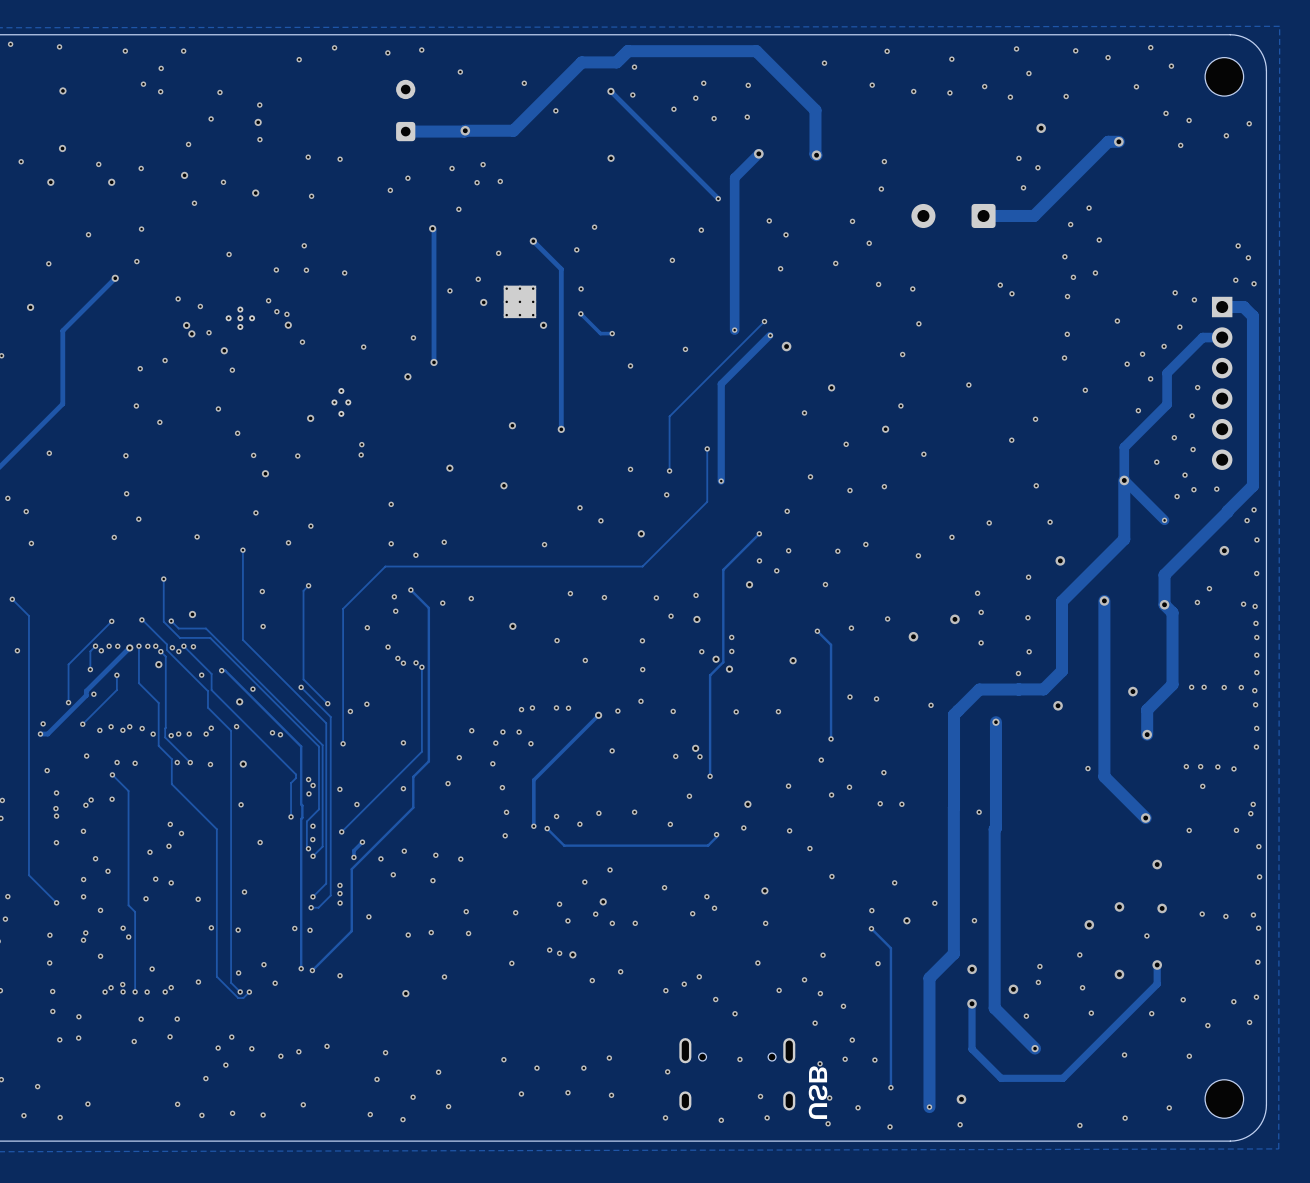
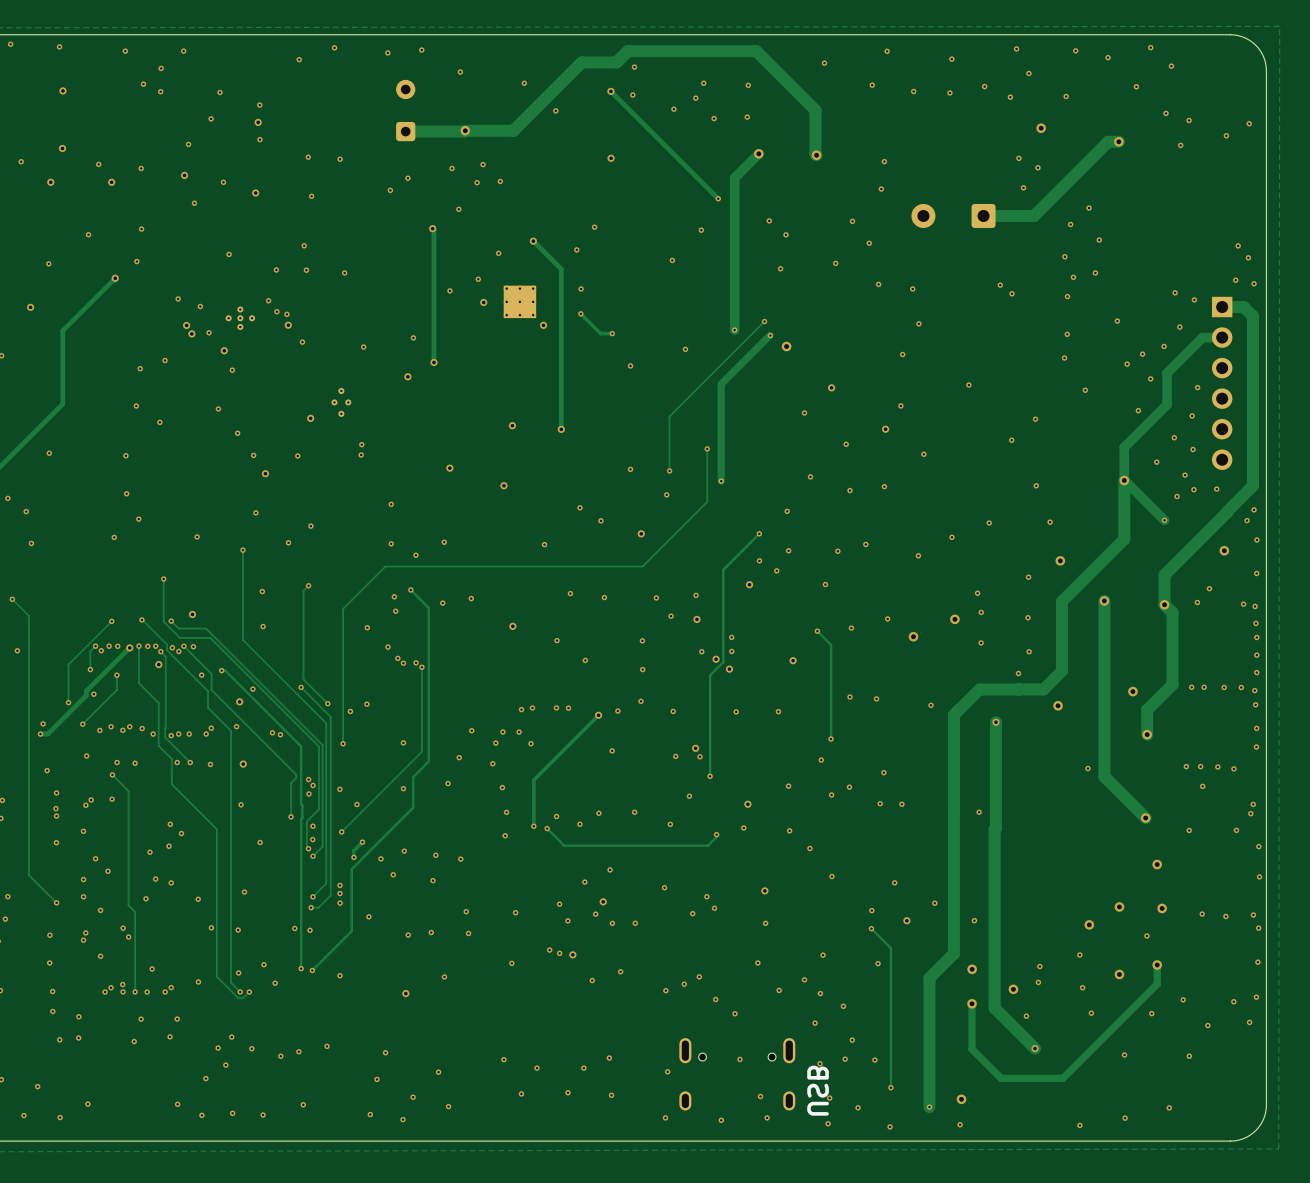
part: (1224, 76) -> none
part: (1224, 1099) -> none

